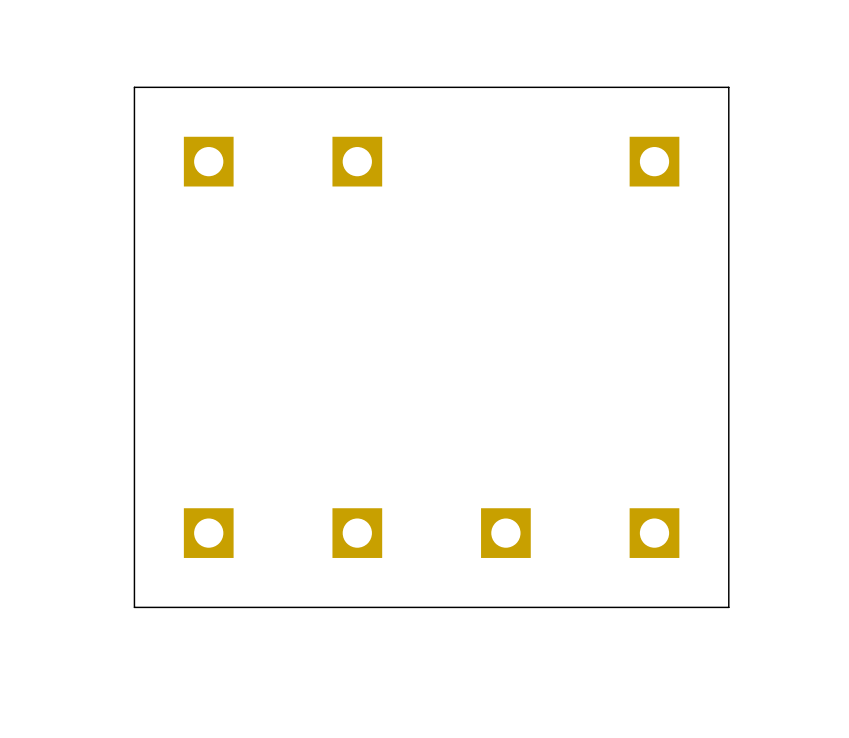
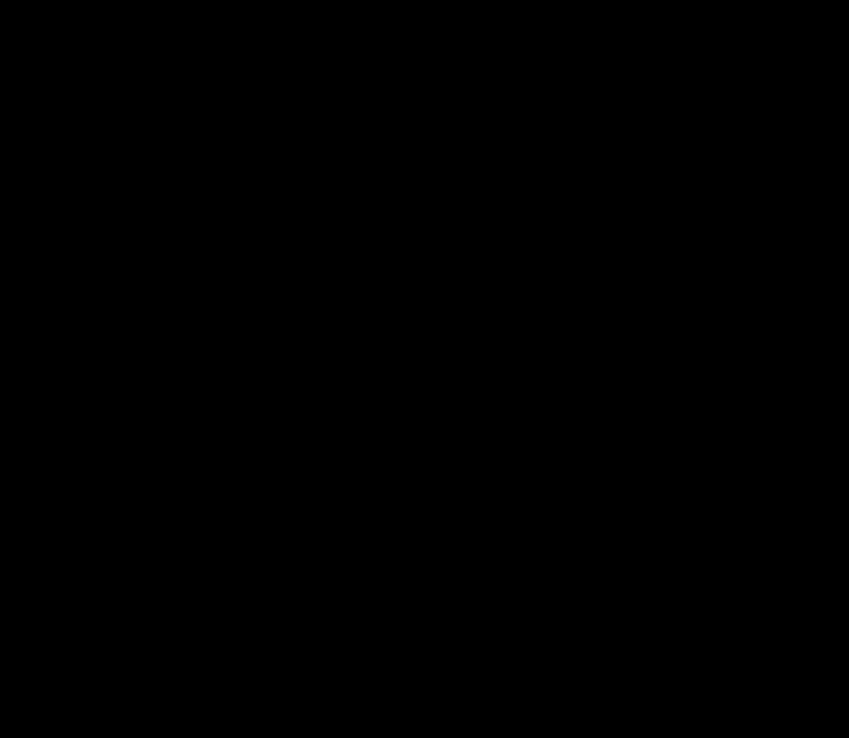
board edge: (728, 87) (134, 87) (134, 607) (728, 607) (728, 87) -> none
part: (208, 161) -> none
part: (357, 161) -> none
part: (654, 161) -> none
part: (208, 533) -> none
part: (357, 533) -> none
part: (505, 533) -> none
part: (654, 533) -> none

